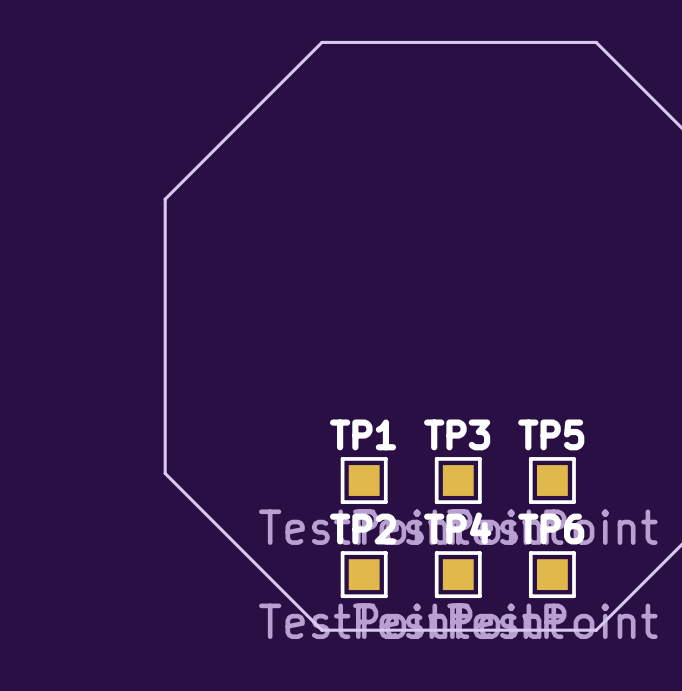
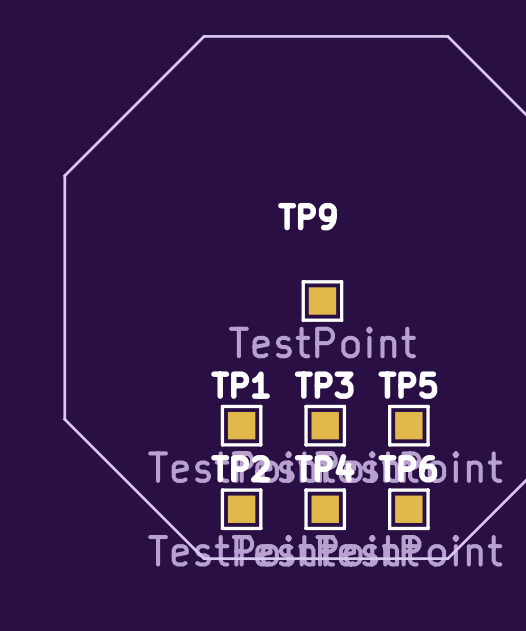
TP9: none -> TestPoint (322, 301)

